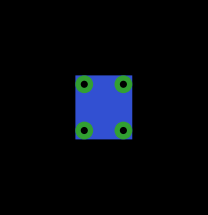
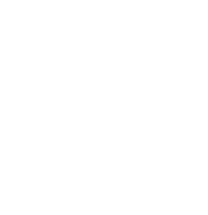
part: (103, 107) -> none

